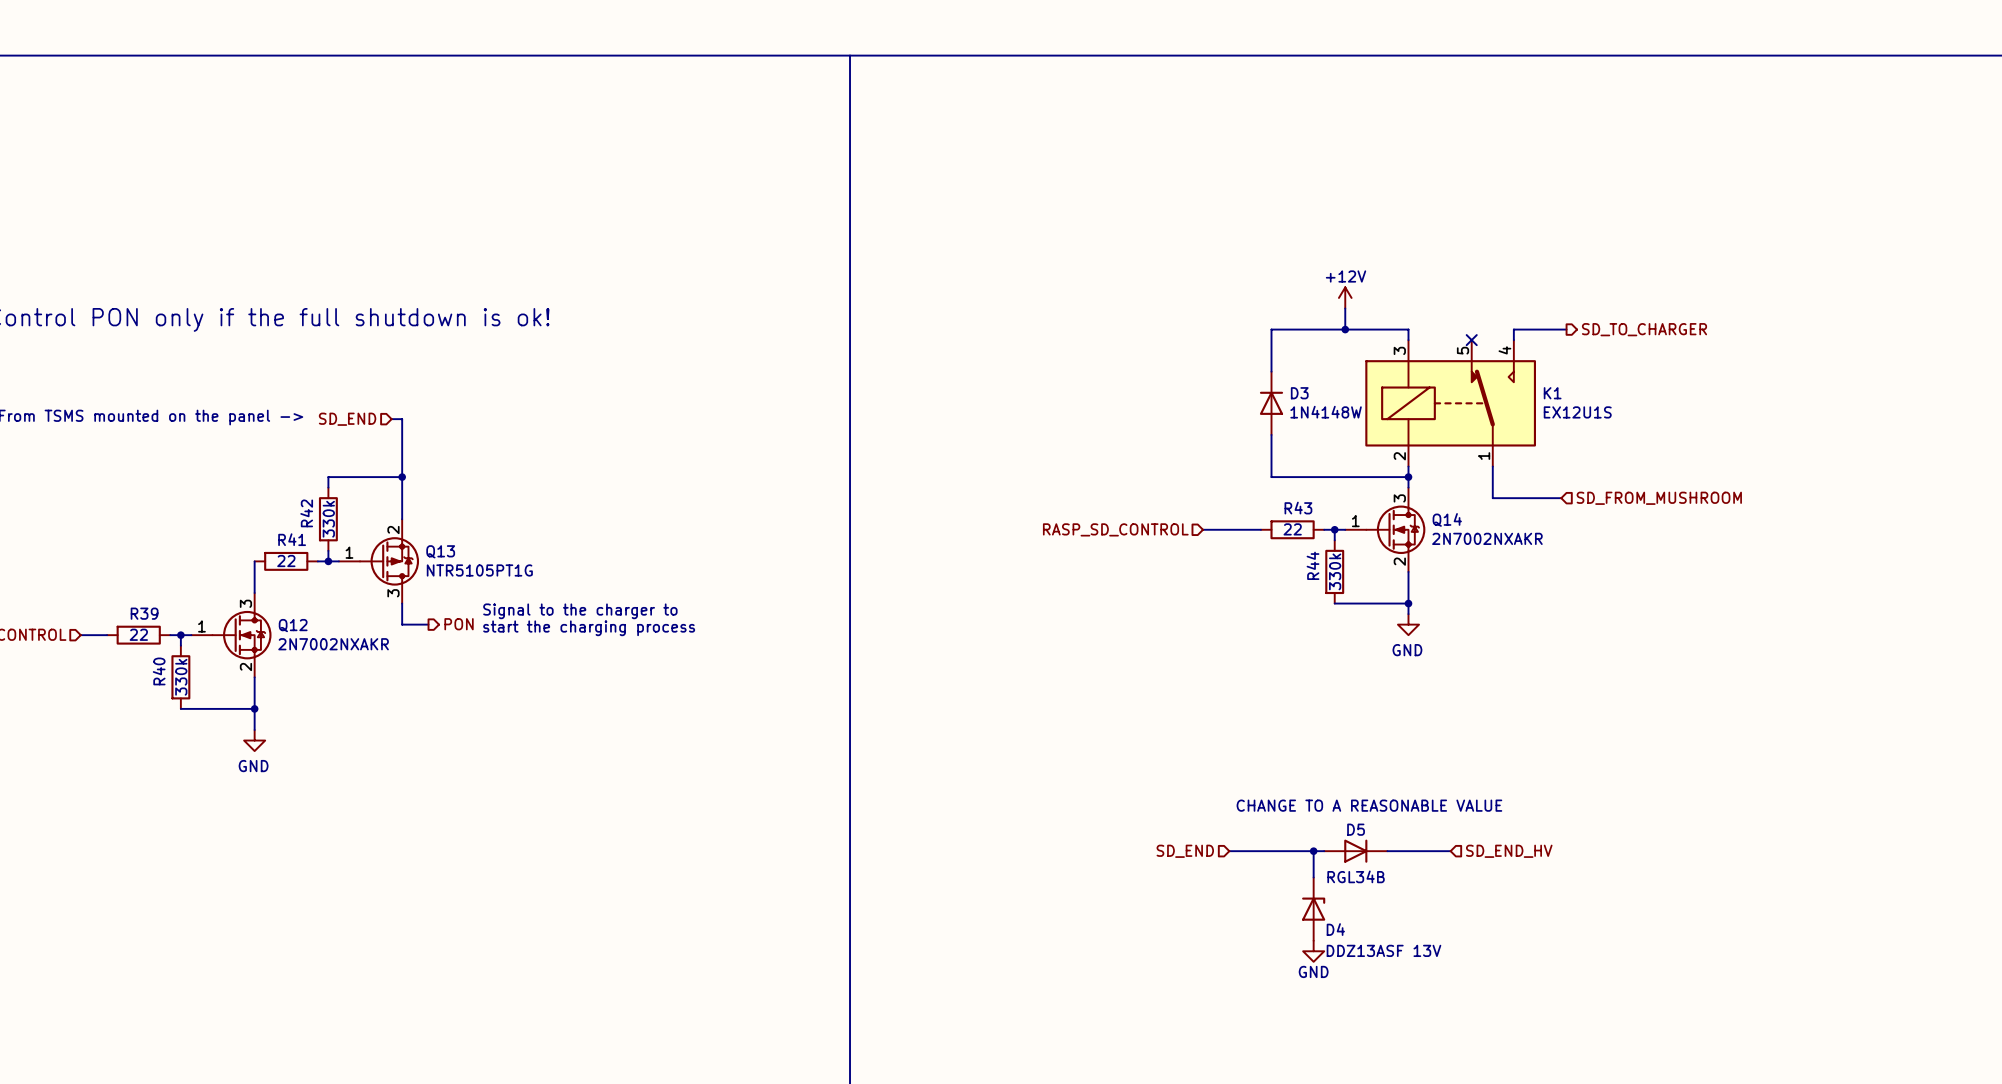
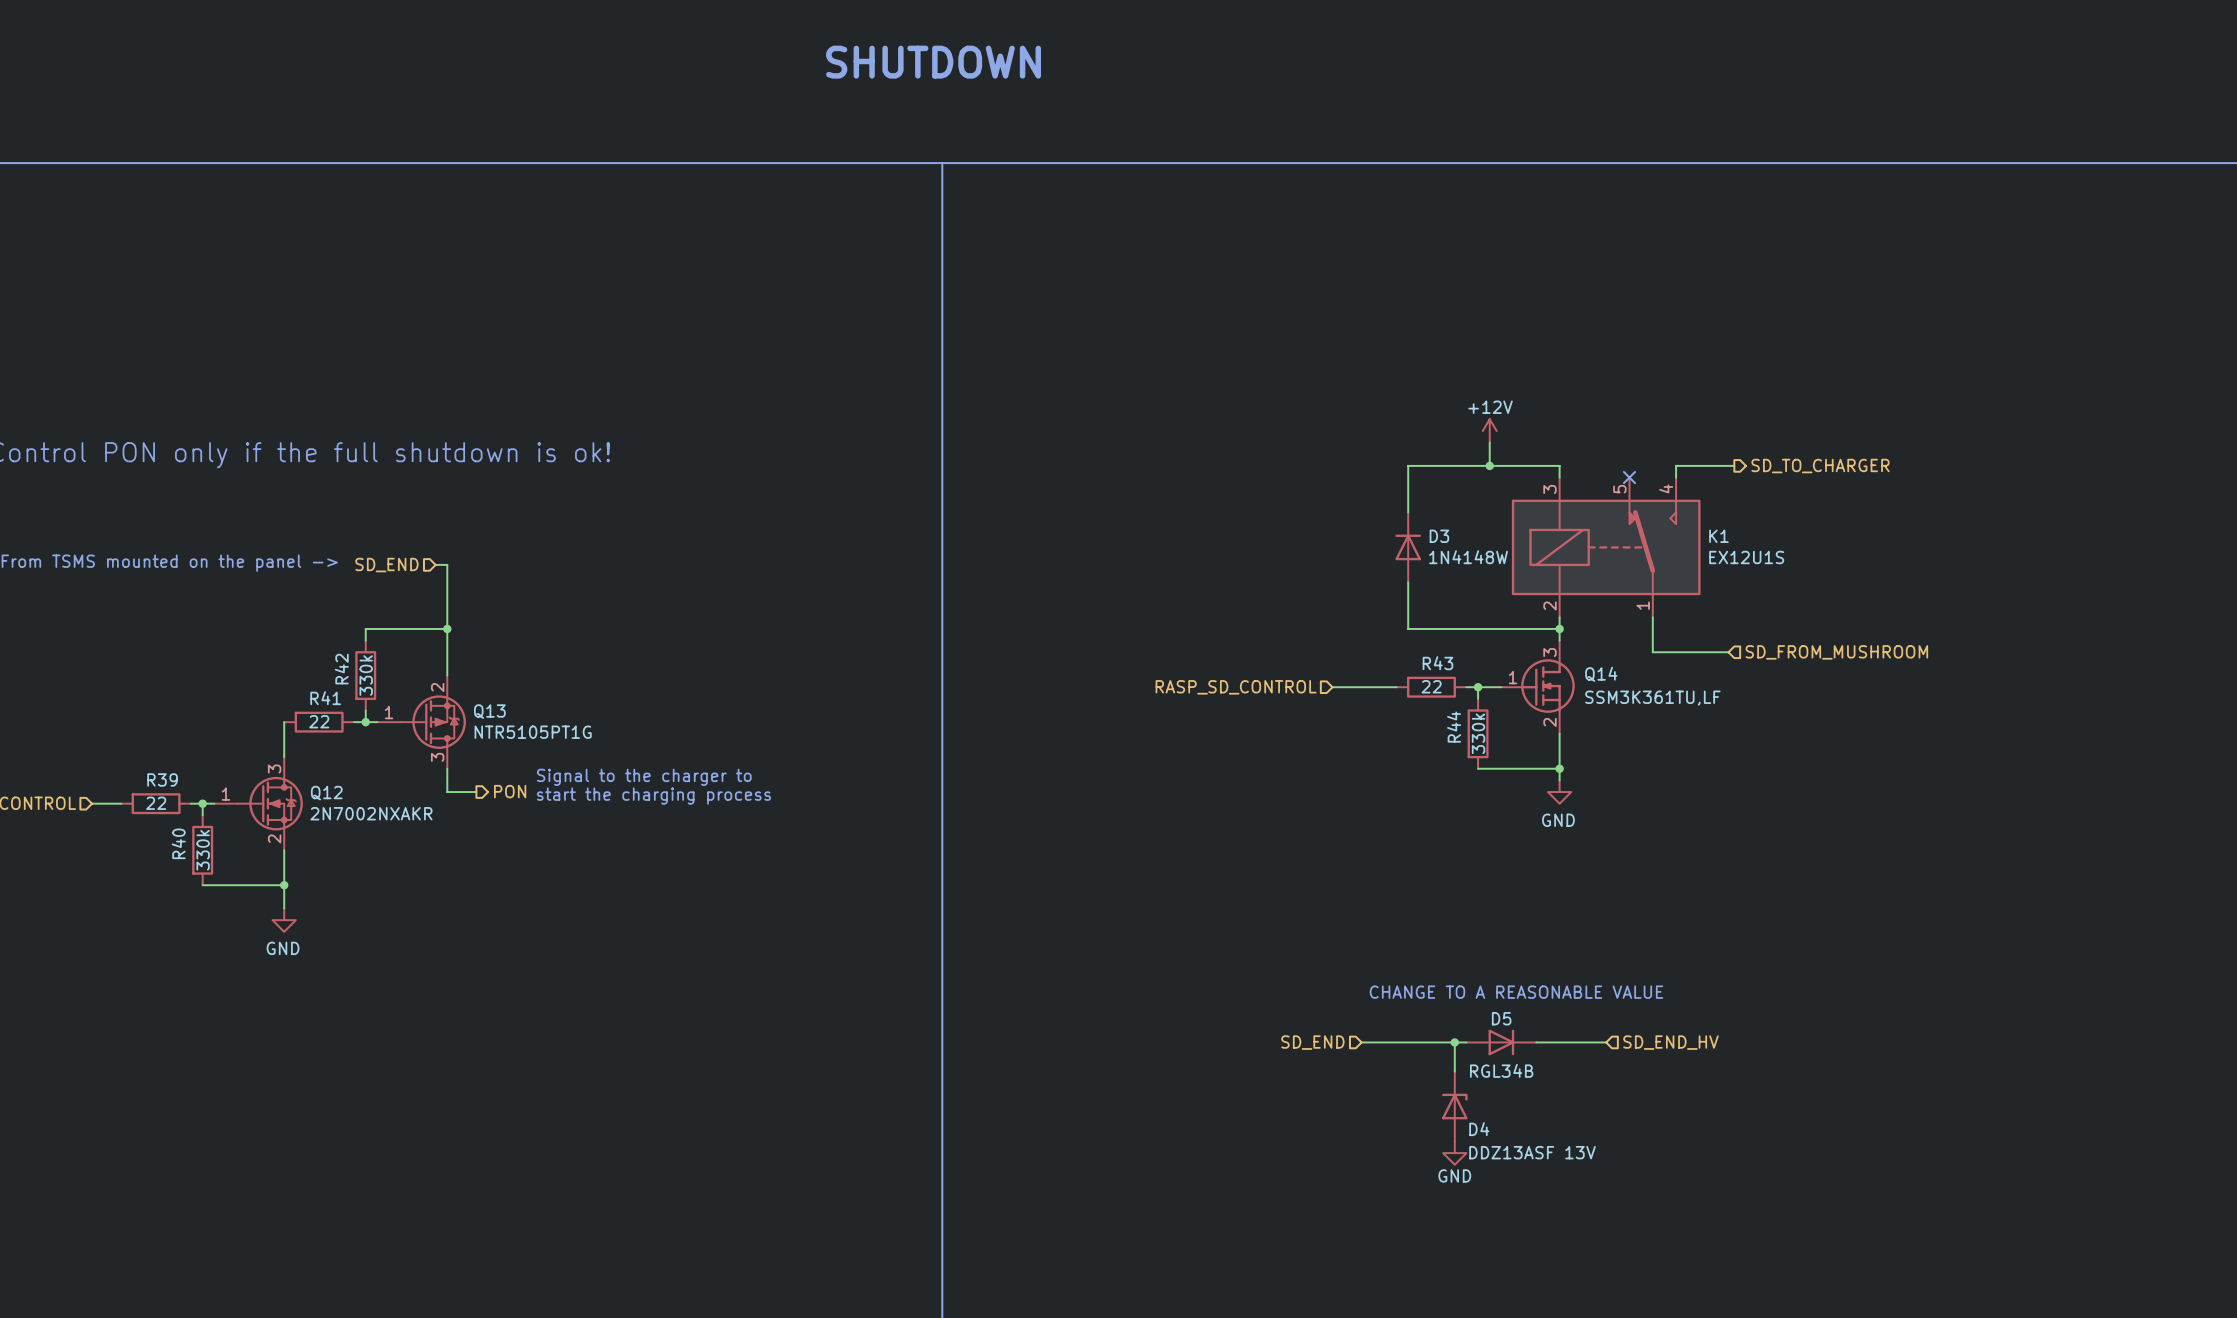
Q14 symbol: [1345, 487, 1426, 572] -> [1501, 640, 1575, 734]
Q14 value: 2N7002NXAKR (1487, 538) -> SSM3K361TU,LF (1652, 698)

